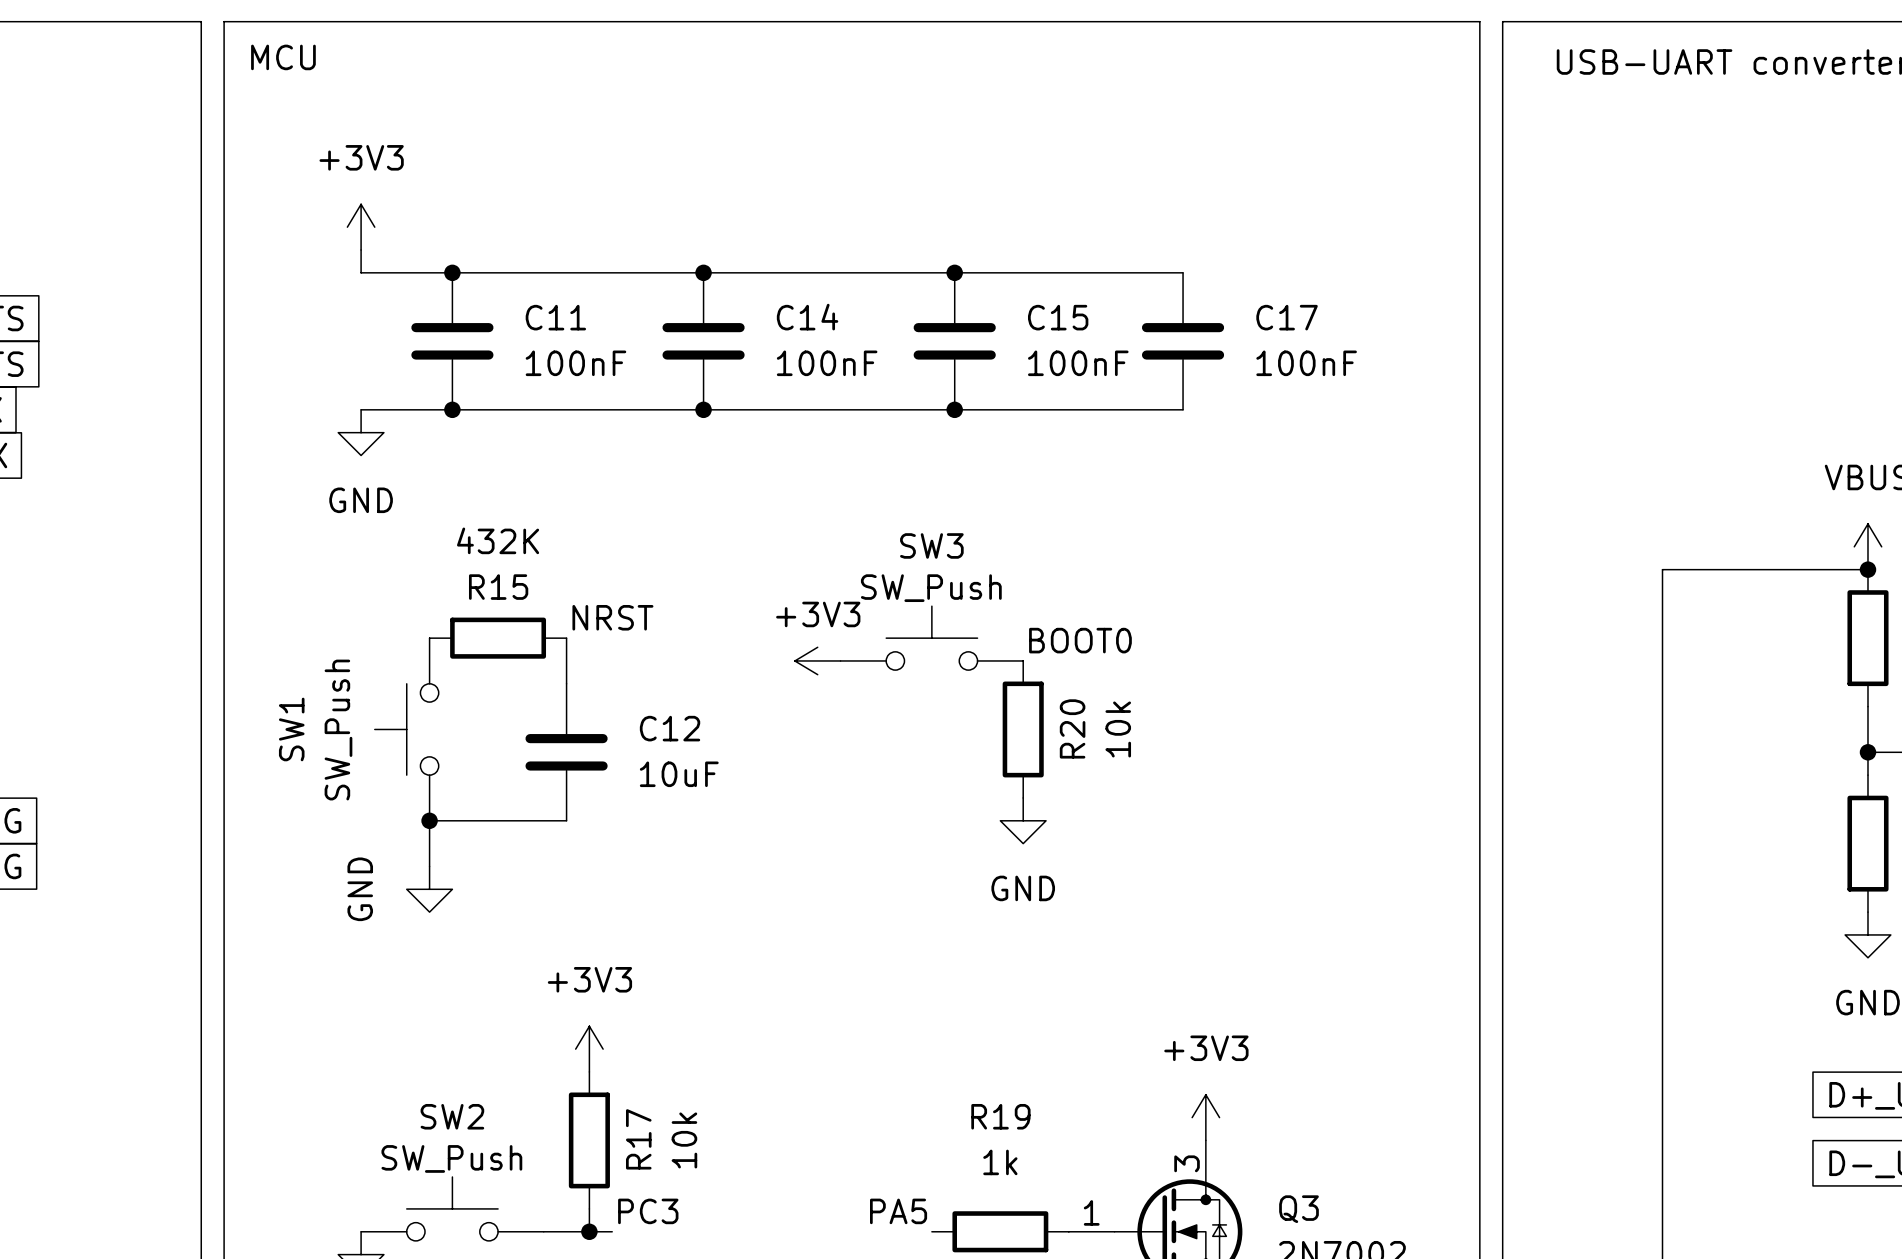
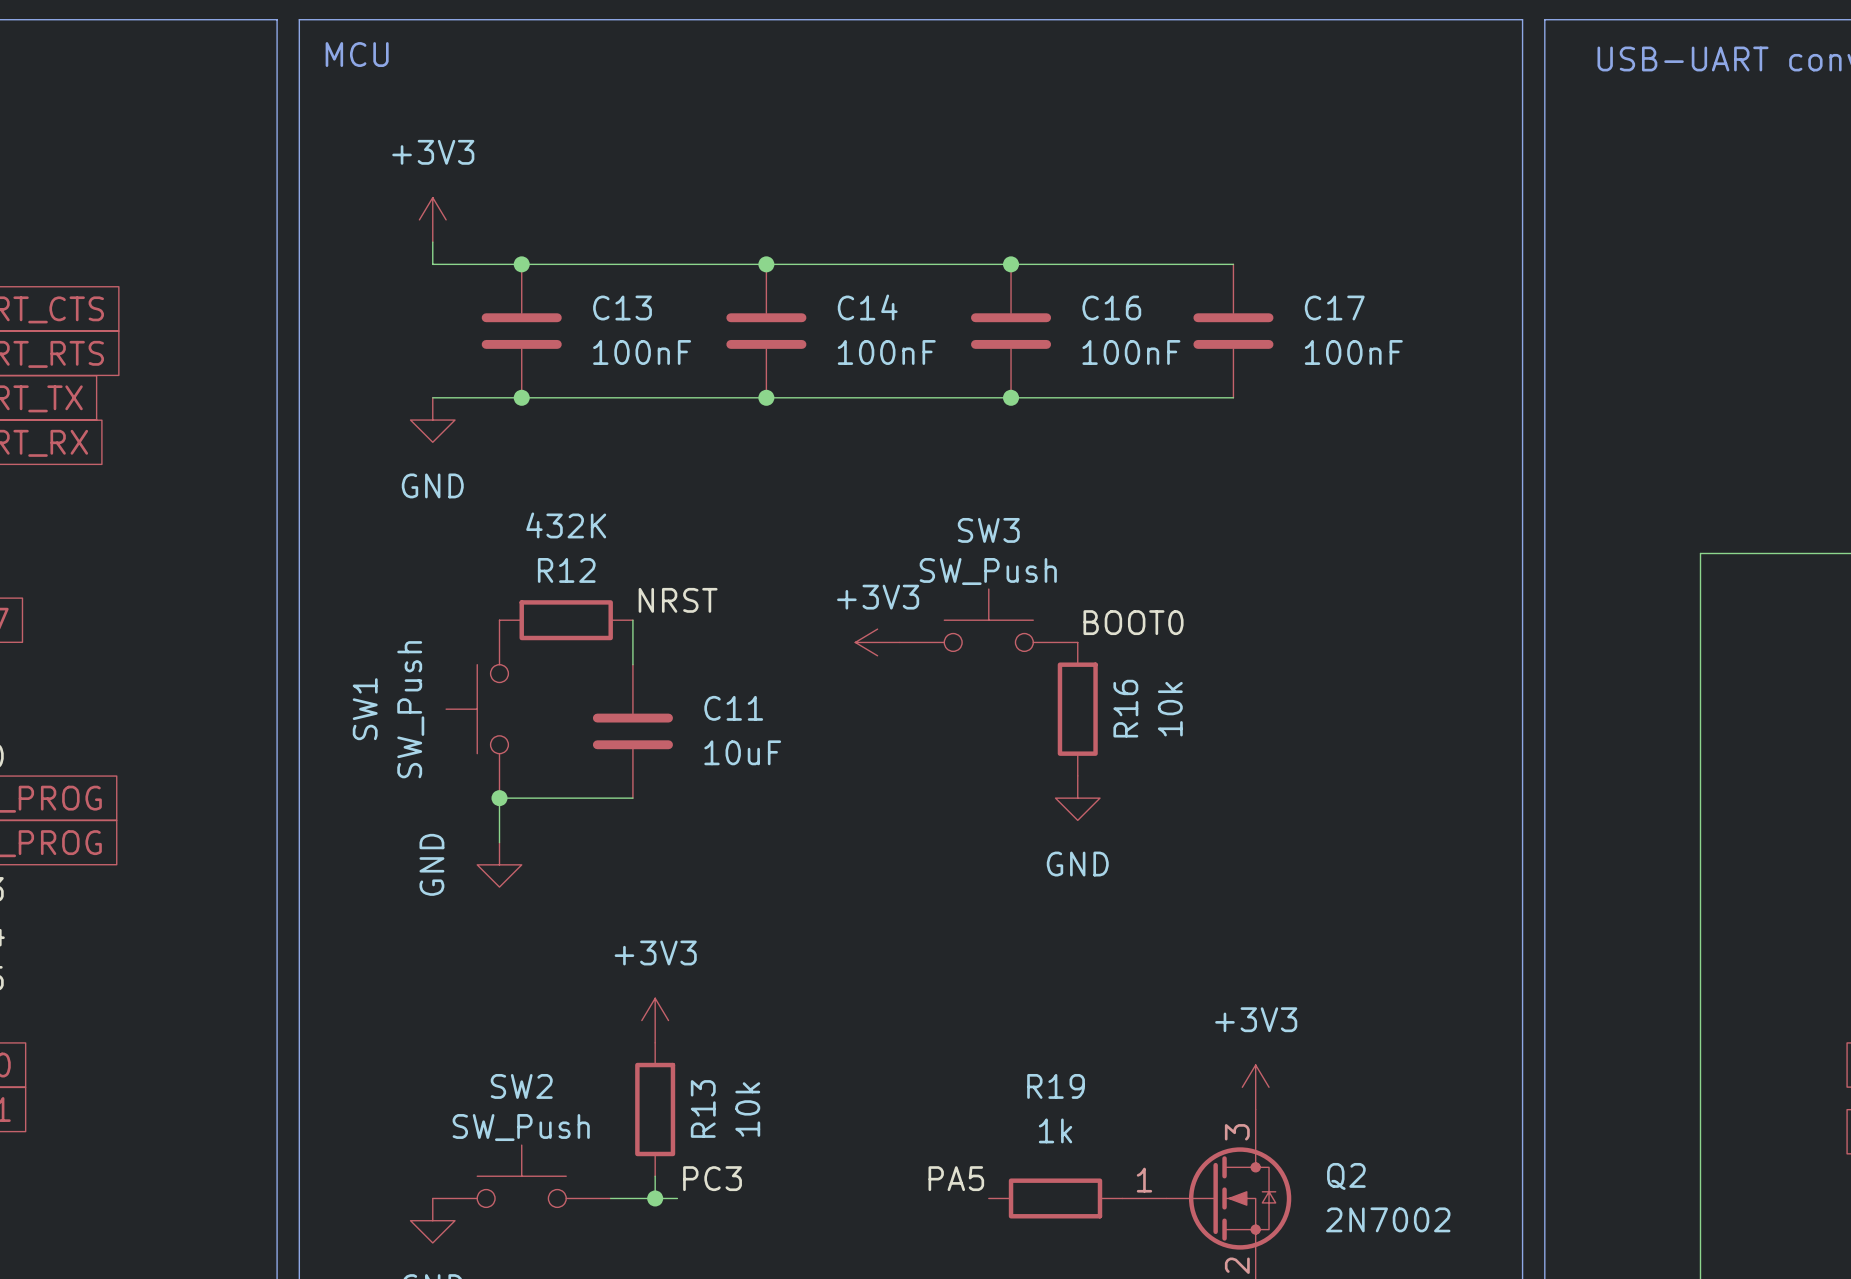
C11 name: C11 (555, 317) -> C13 (622, 308)
C15 name: C15 (1058, 317) -> C16 (1111, 308)
R15 name: R15 (498, 587) -> R12 (566, 570)
C12 name: C12 (670, 728) -> C11 (733, 708)
R20 name: R20 (1072, 728) -> R16 (1125, 708)
R17 name: R17 (638, 1139) -> R13 (703, 1108)
Q3 name: Q3 (1298, 1209) -> Q2 (1346, 1176)

